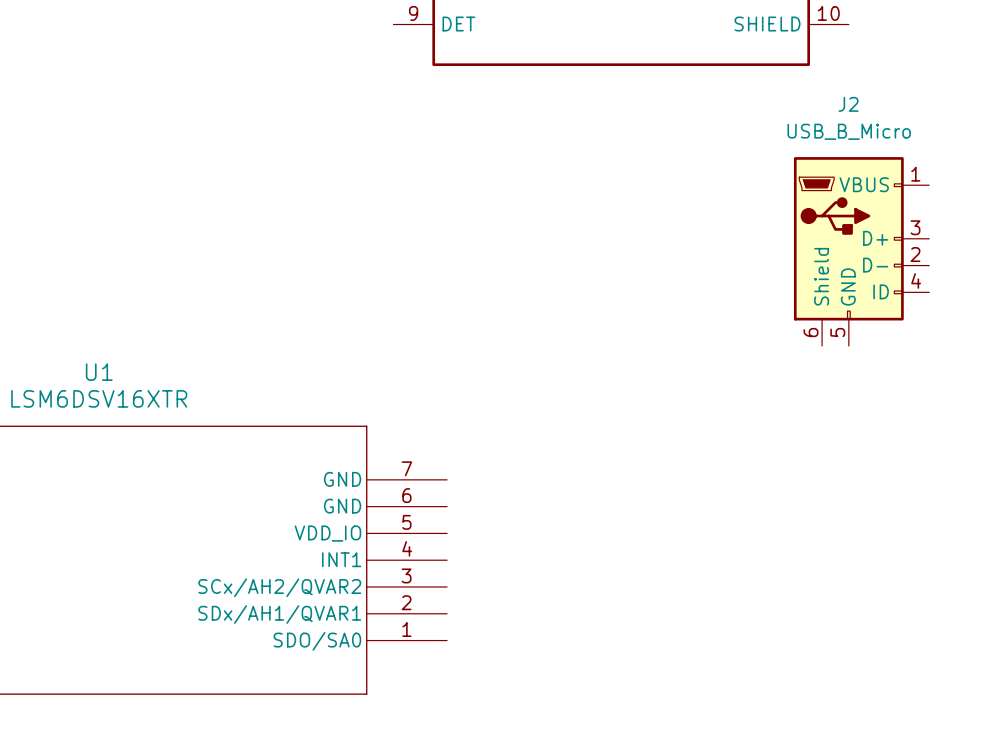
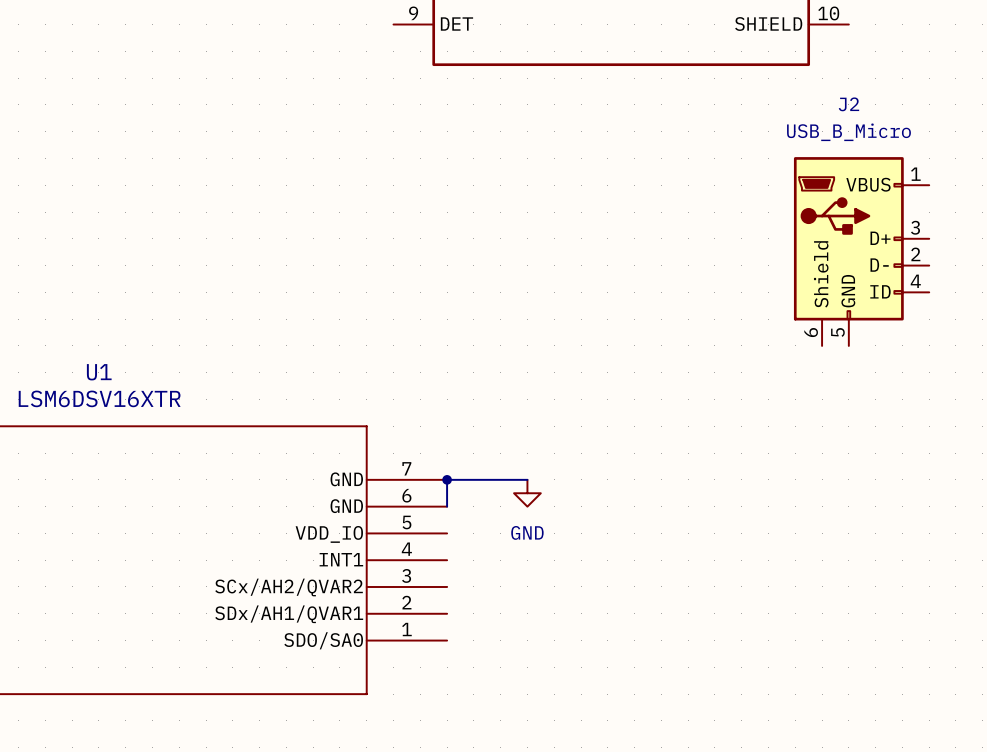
junction: none -> (447, 479)
wire: none -> (527, 479) (447, 479) (447, 506)
power symbol: none -> GND (527, 493)

